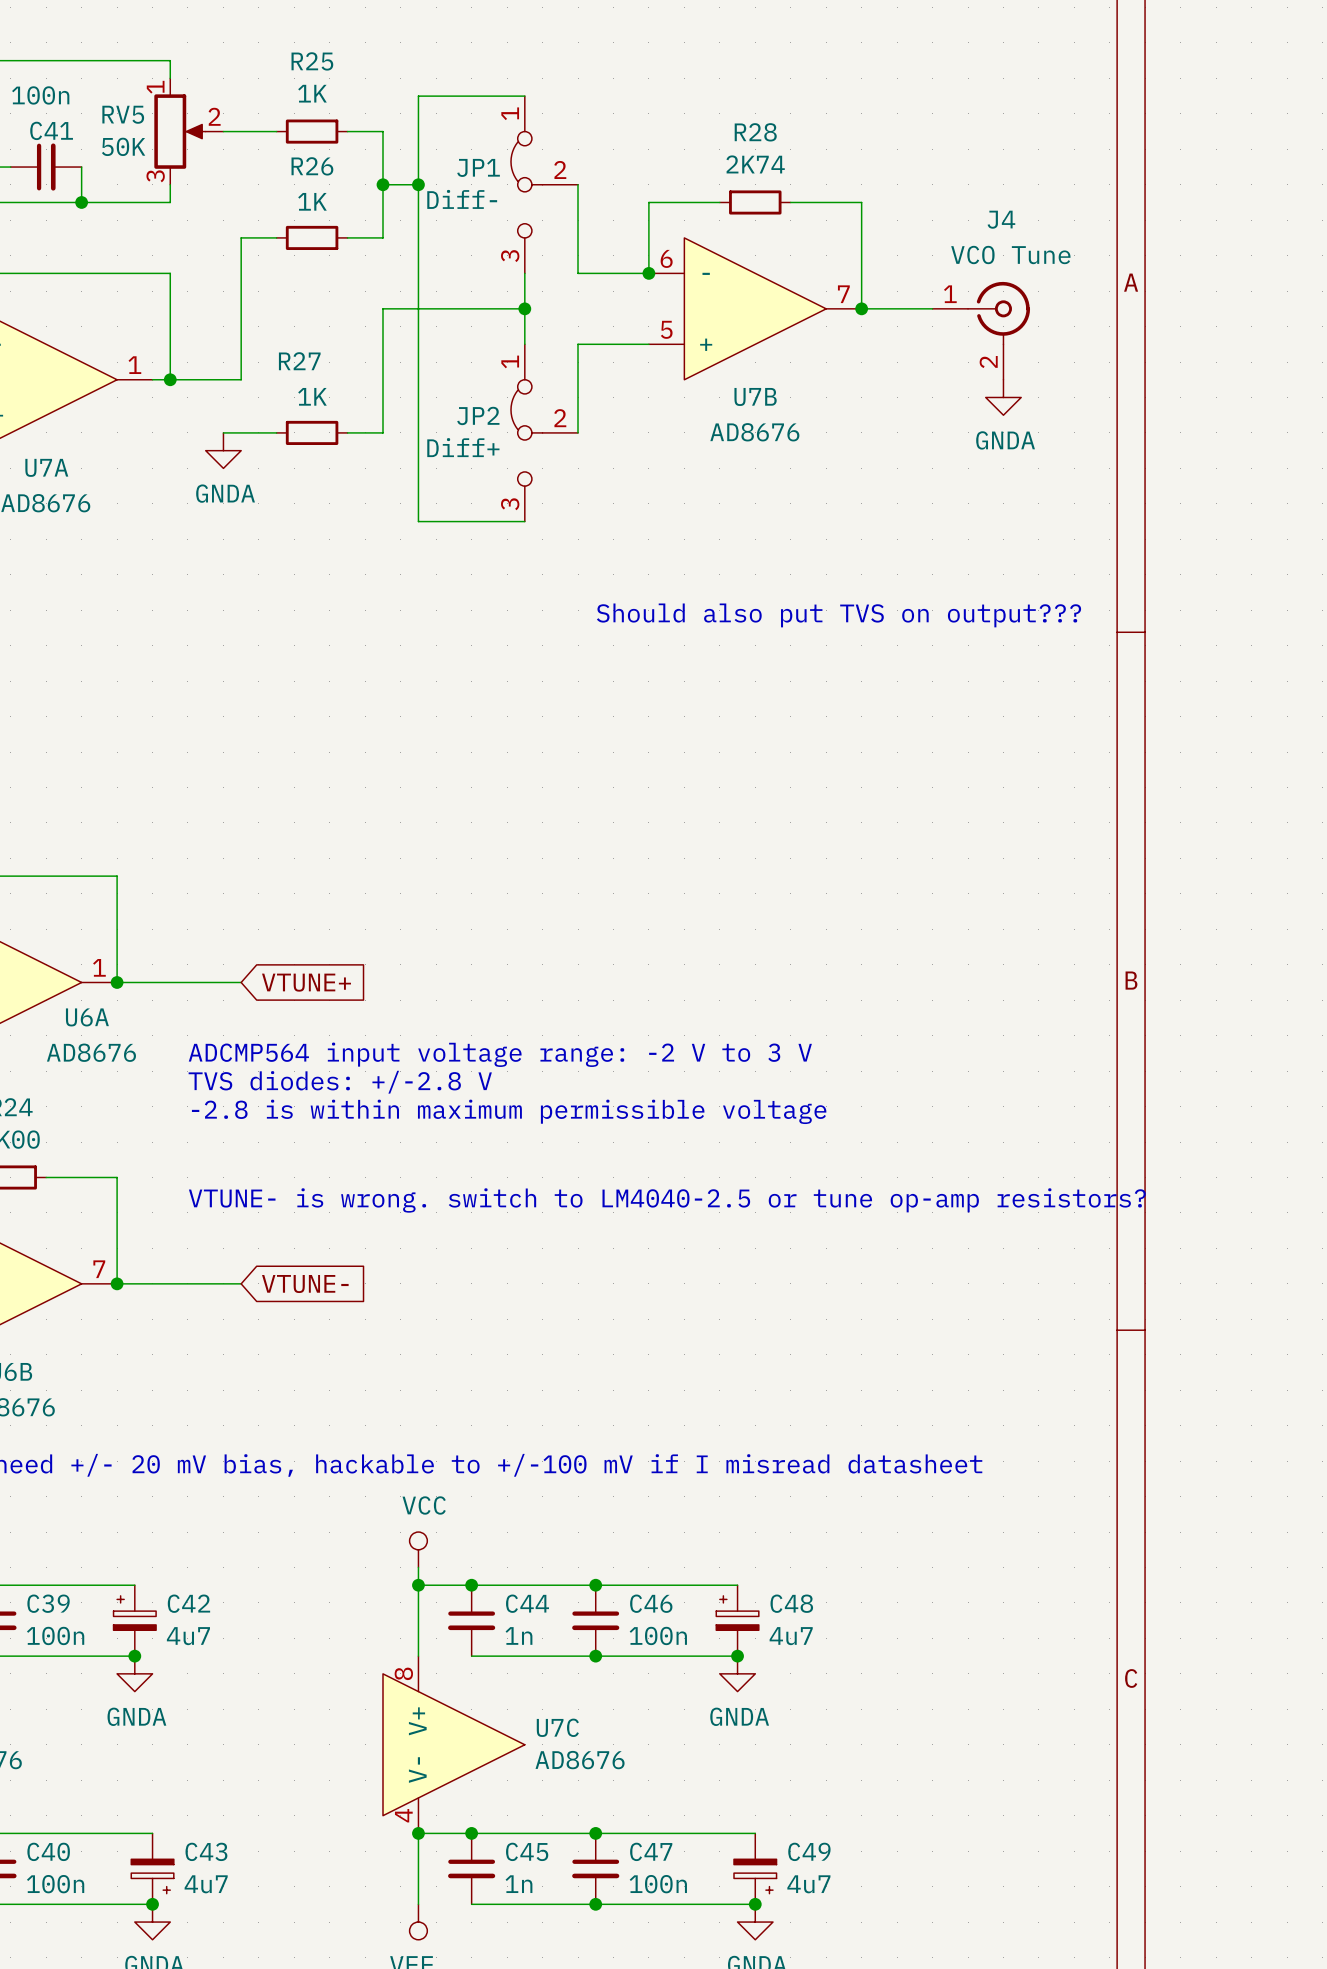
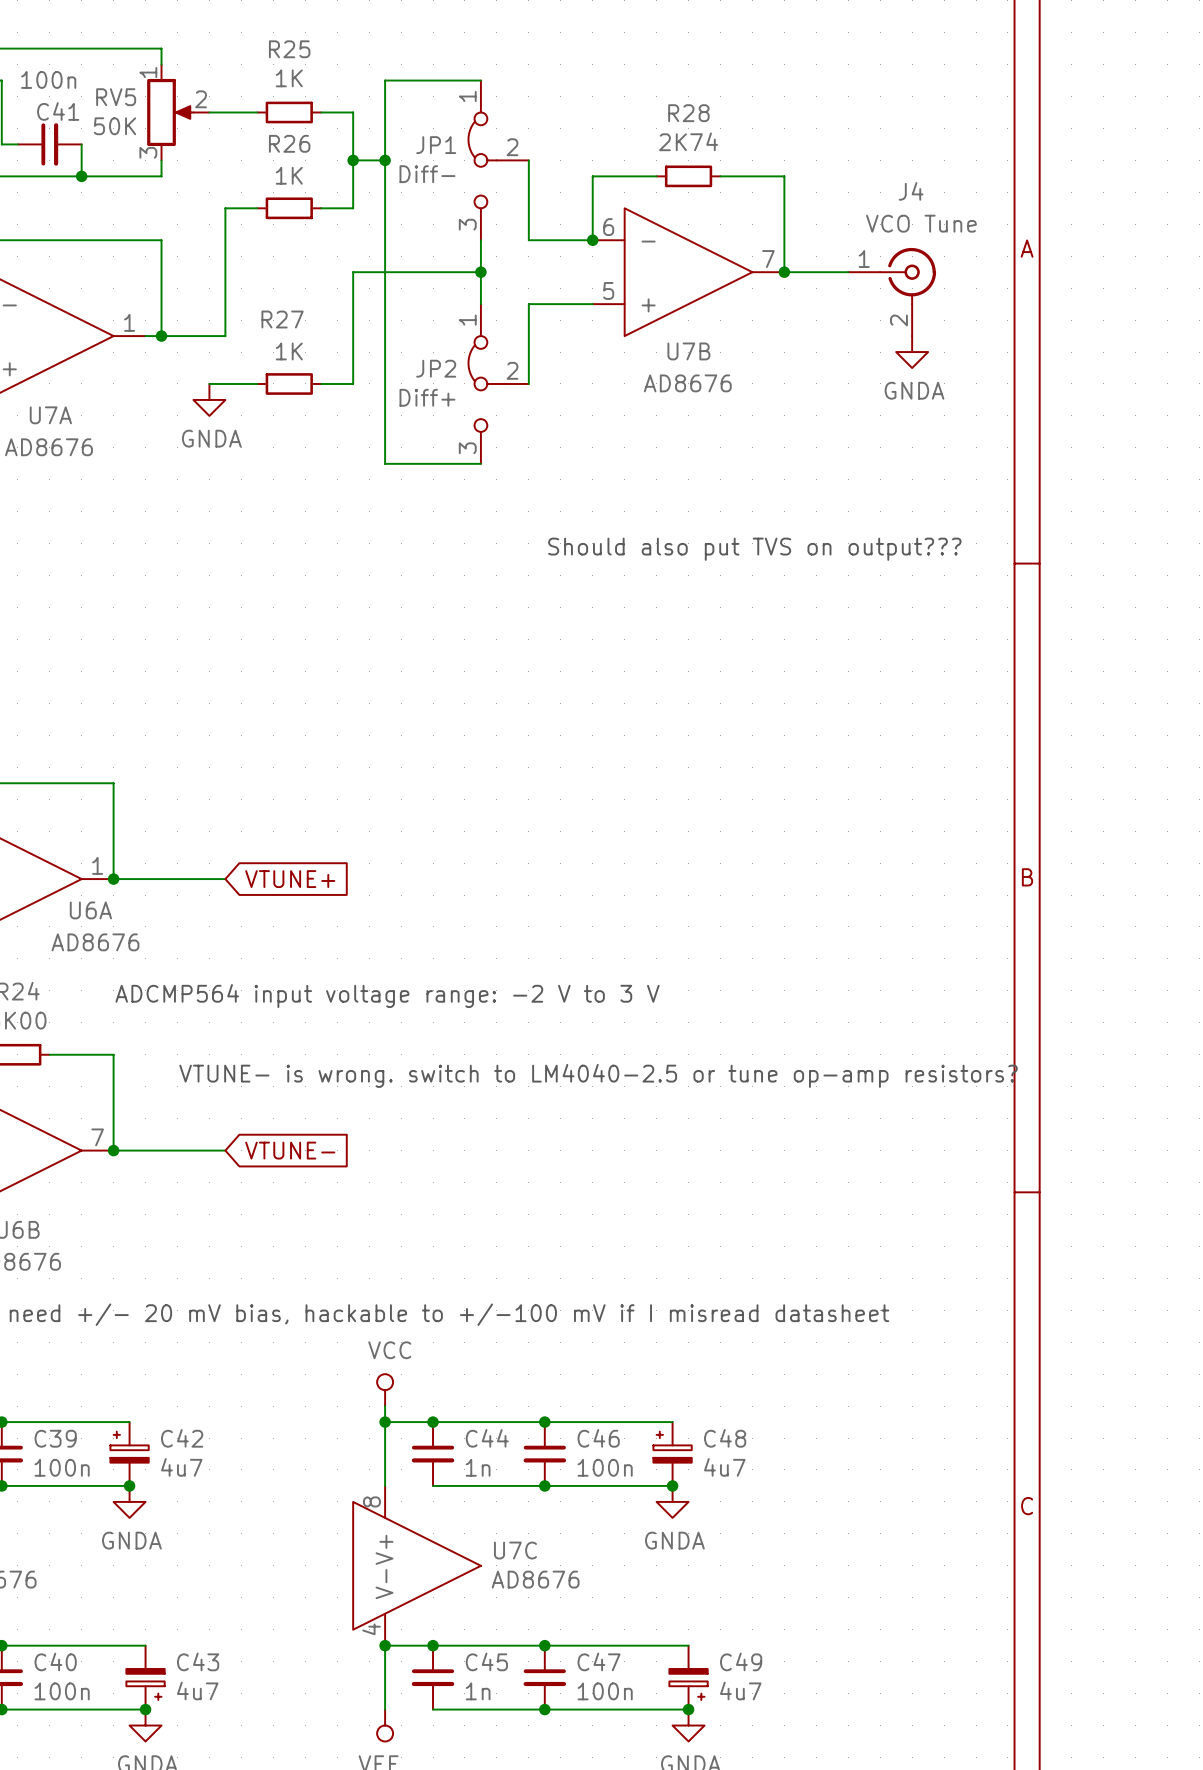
text position: ADCMP564 input voltage range: -2 V to 3 V (500, 1054) -> ADCMP564 input voltage range: -2 V to 3 V (387, 996)
text: TVS diodes: +/-2.8 V (340, 1082) -> none
text: -2.8 is within maximum permissible voltage (509, 1111) -> none

